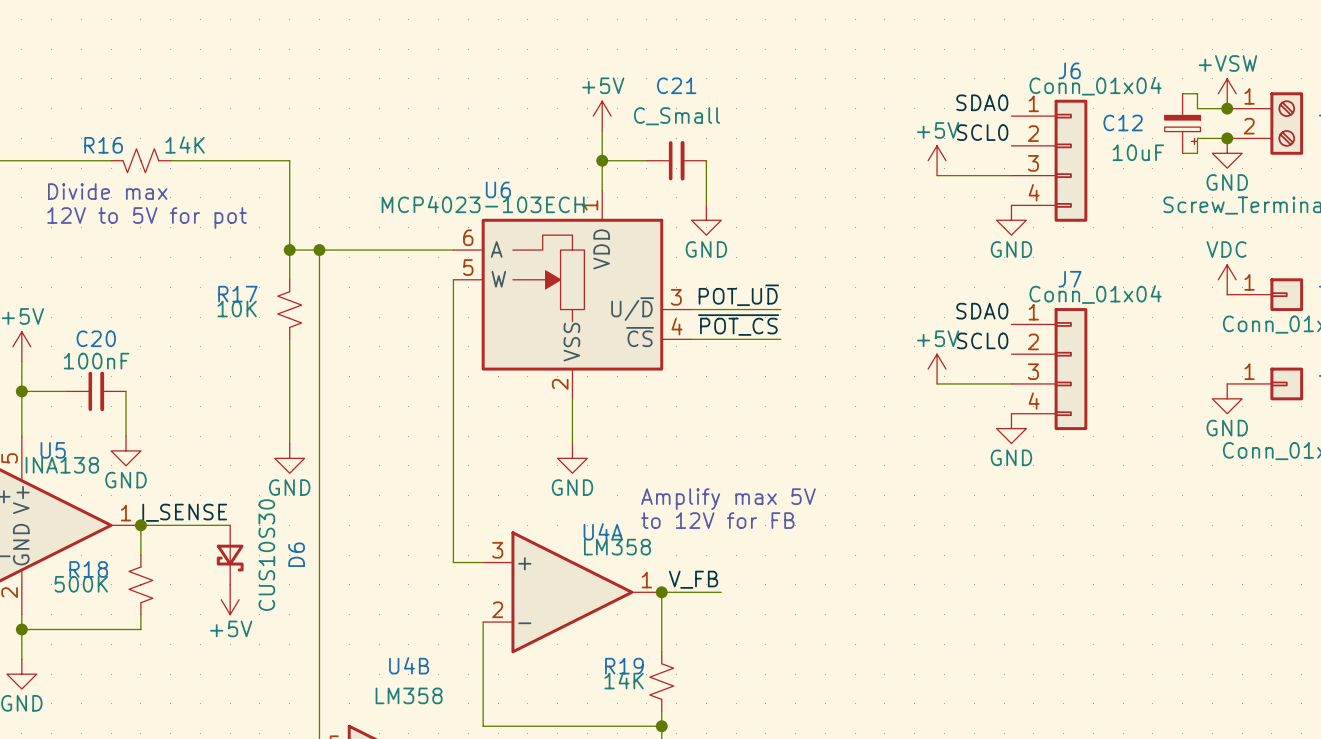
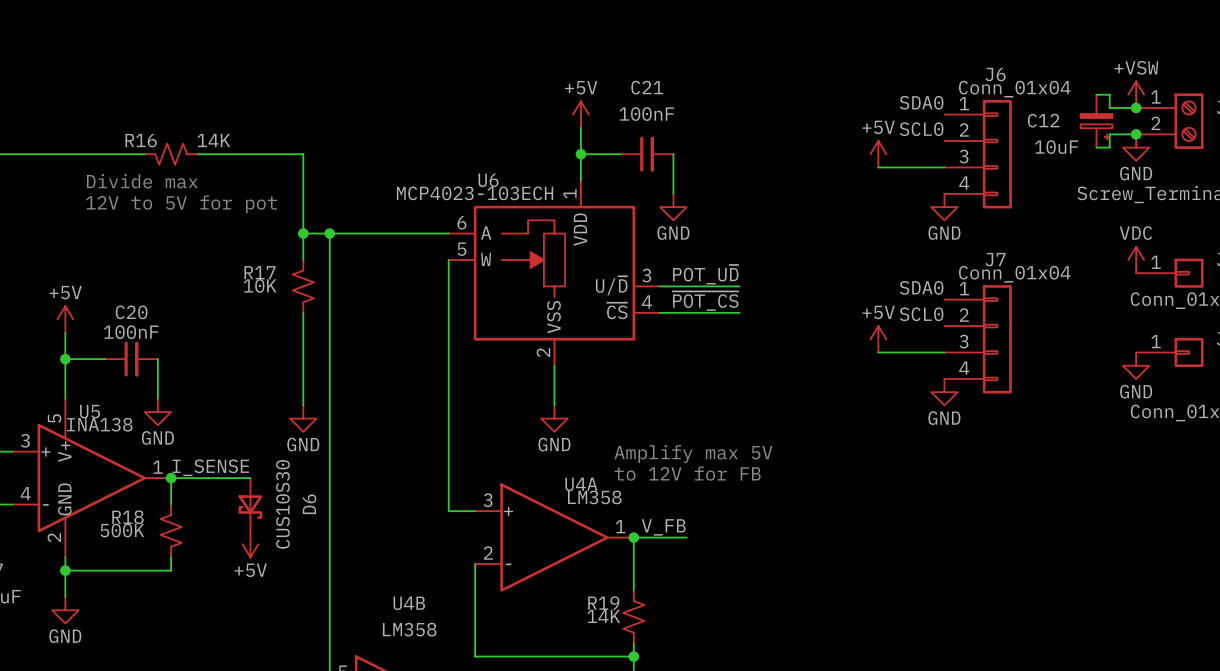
C21 value: C_Small (676, 116) -> 100nF (646, 114)

